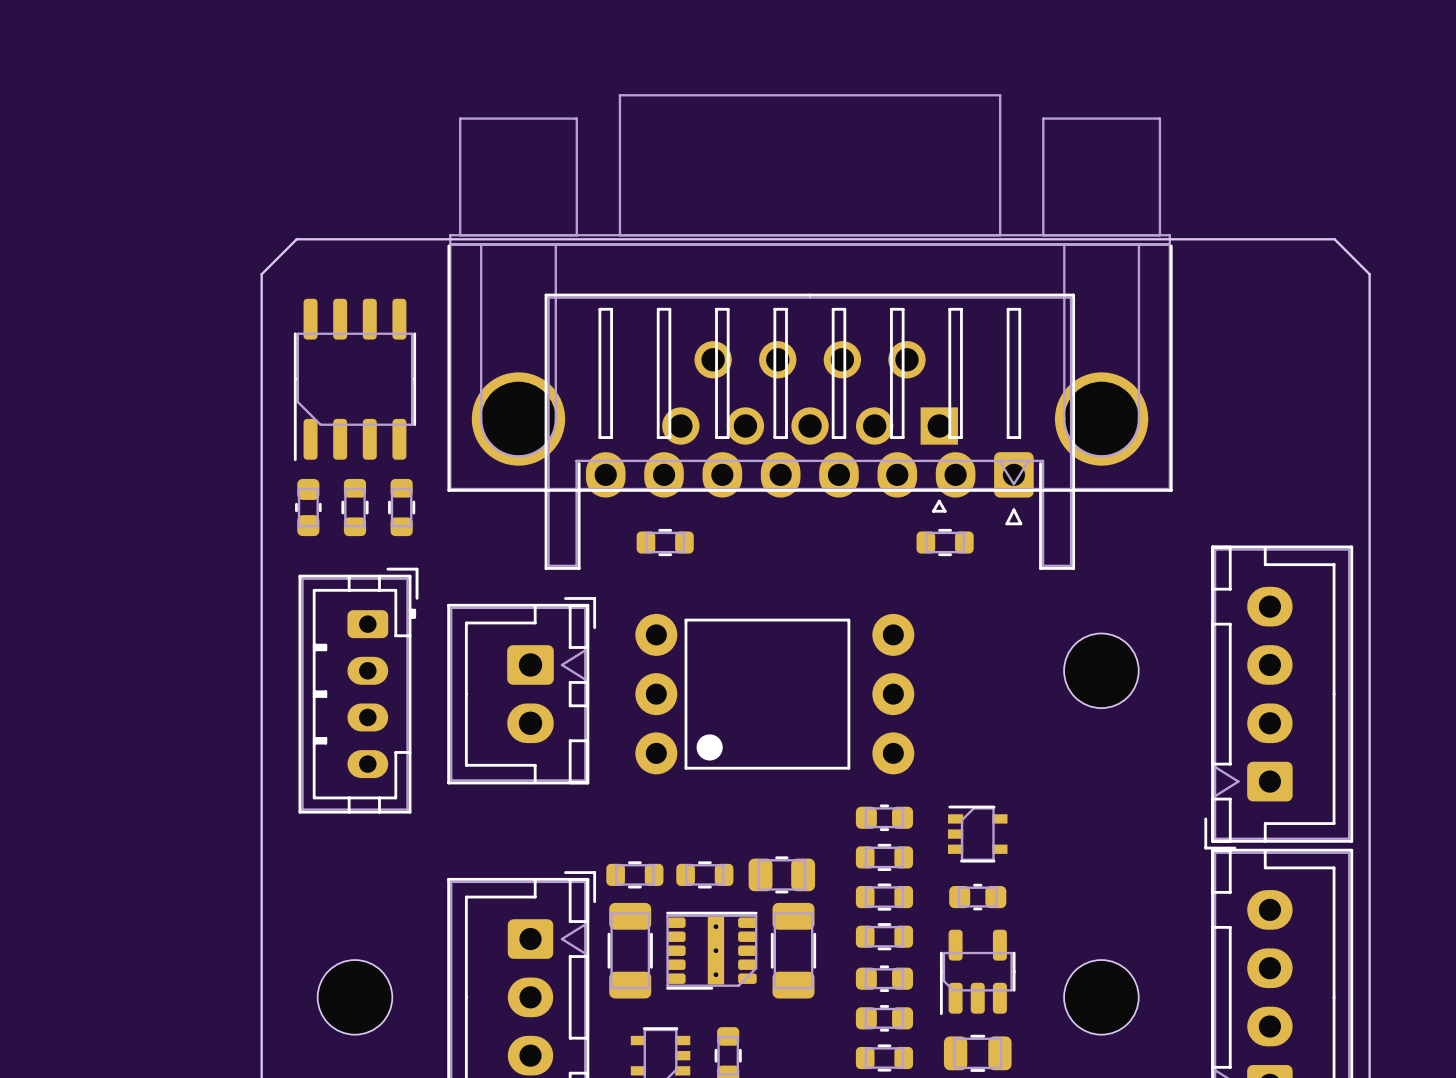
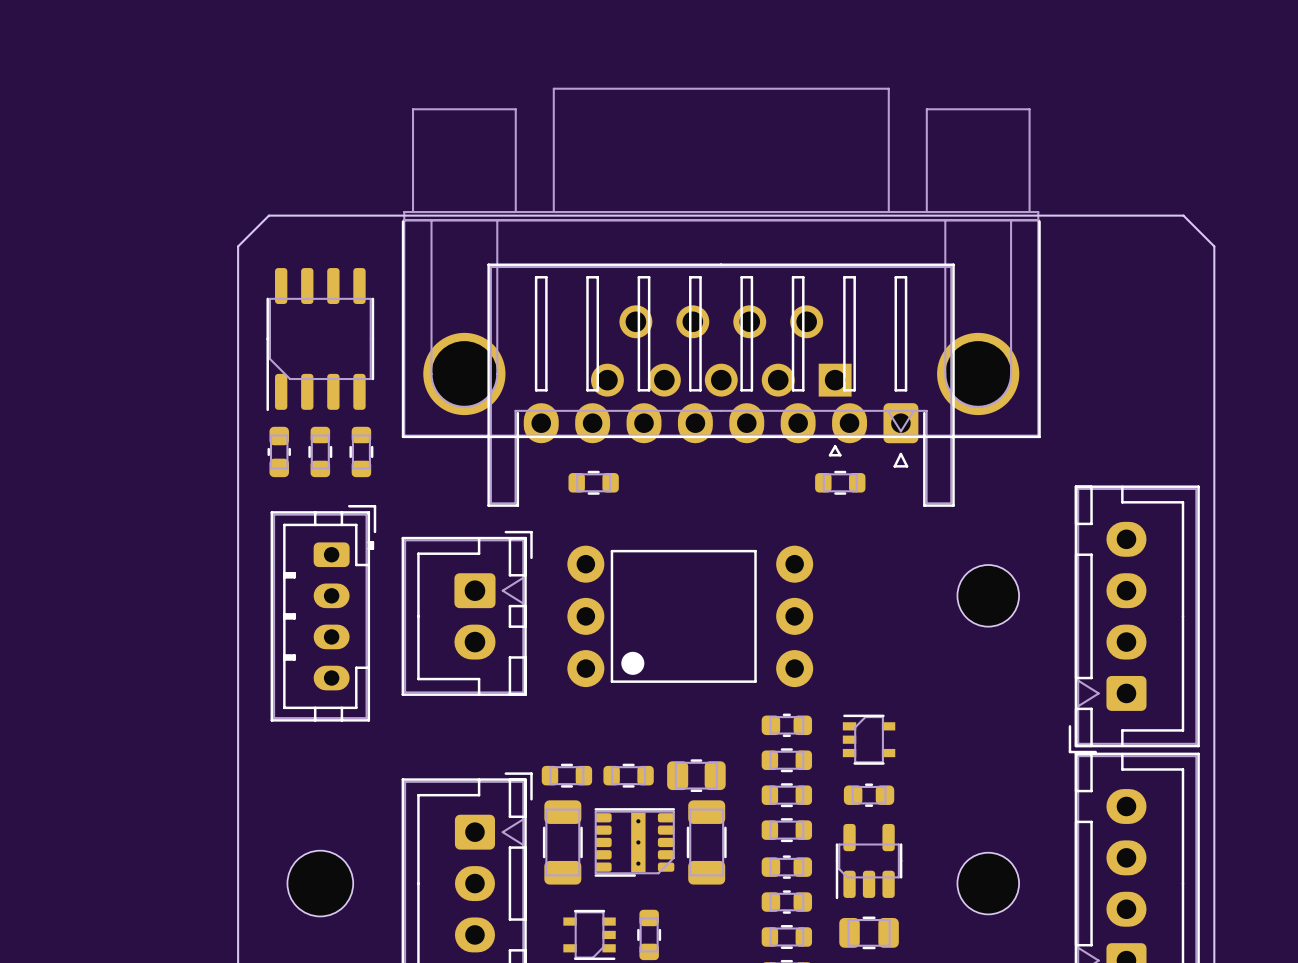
part footprint: [1064, 633, 1139, 709] -> [957, 565, 1020, 627]
part footprint: [1064, 960, 1139, 1035] -> [957, 852, 1020, 915]

